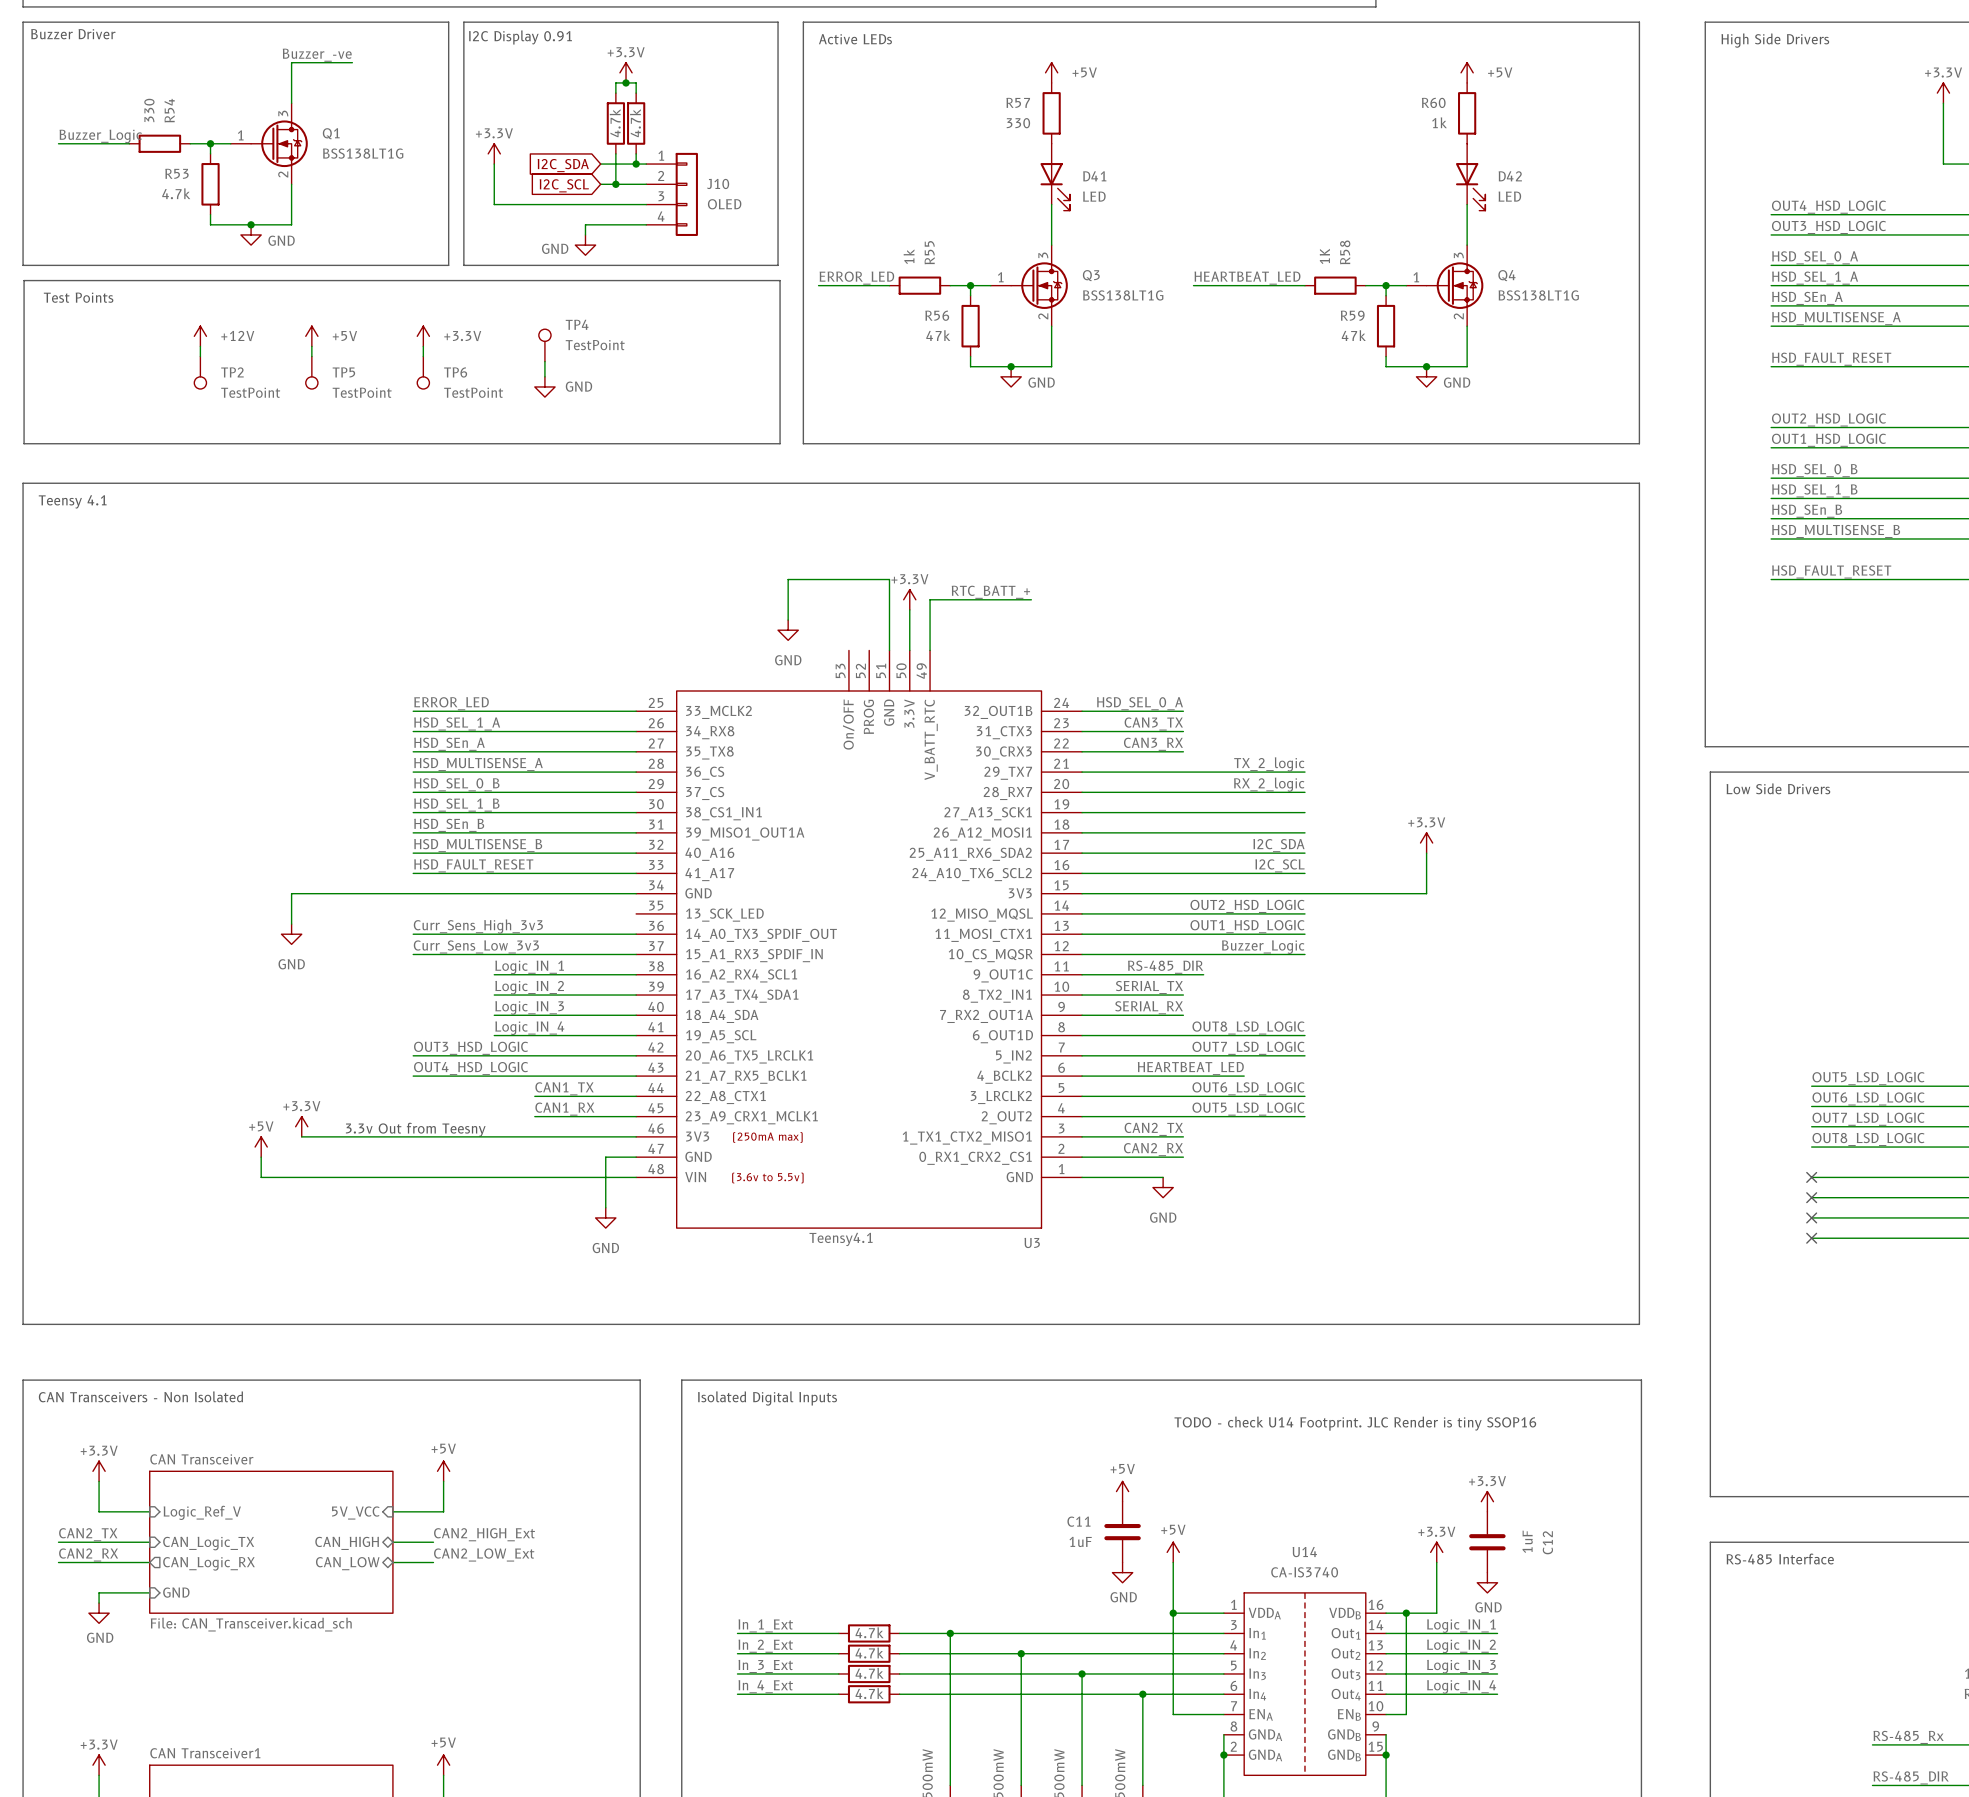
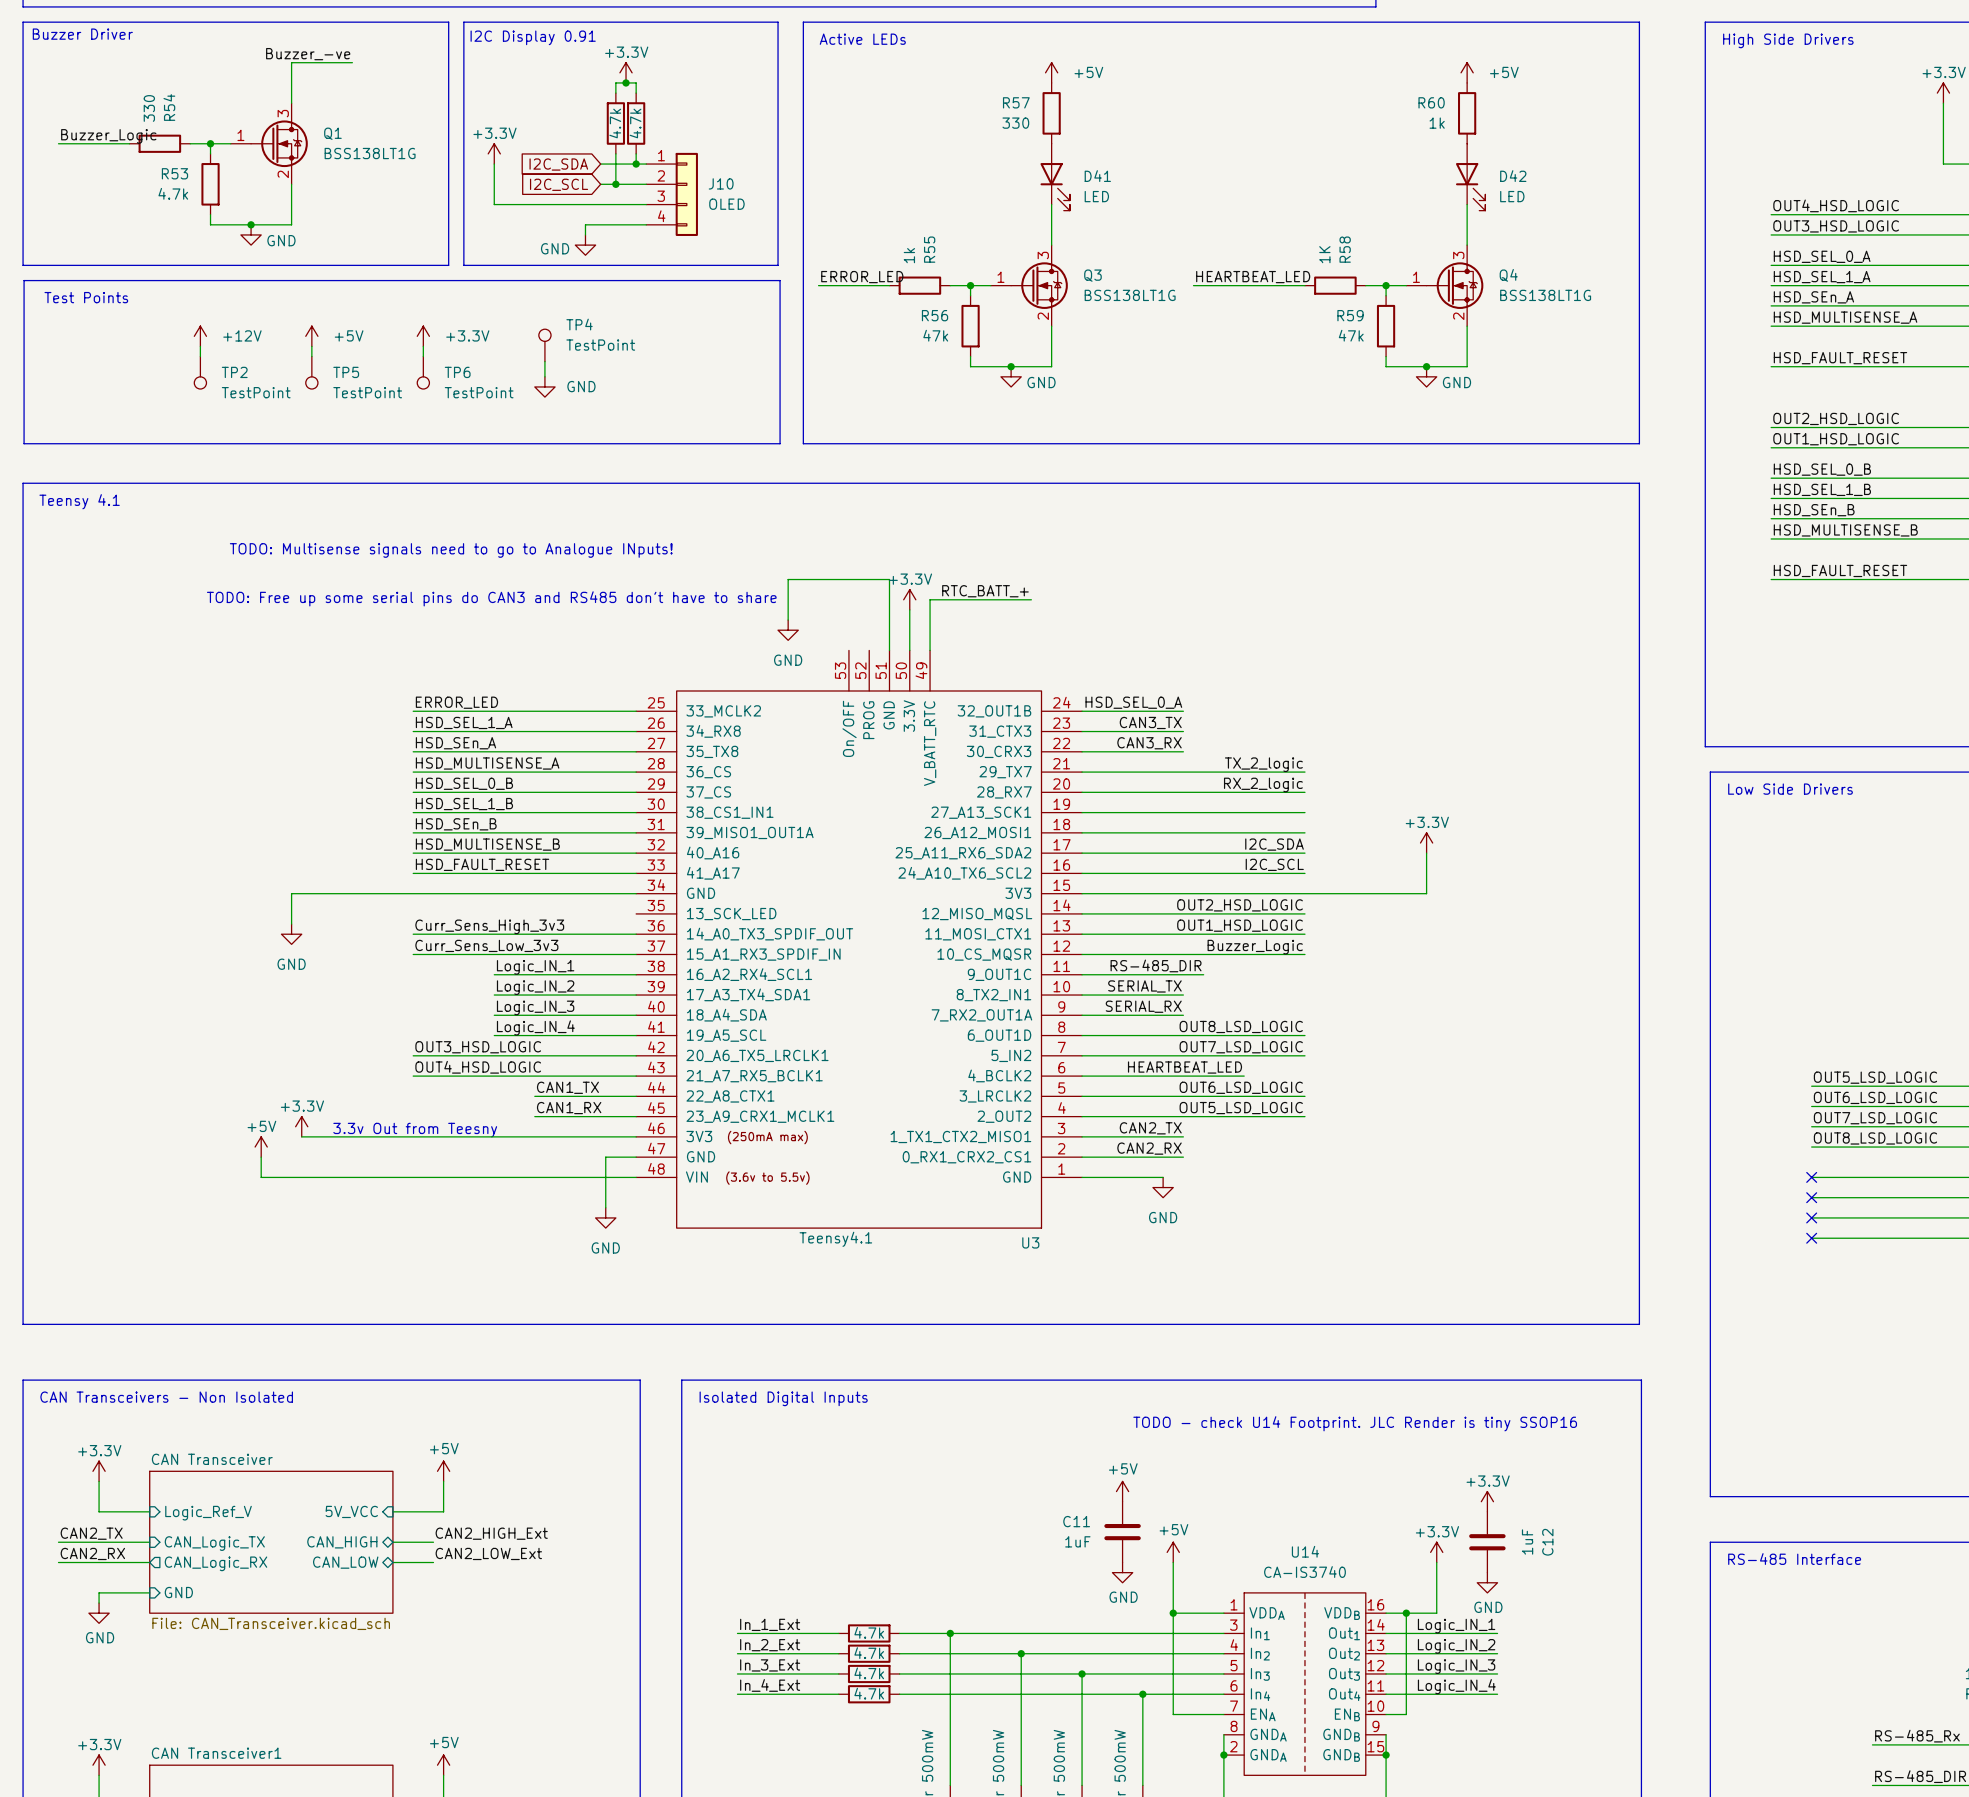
text: none -> TODO: Multisense signals need to go to Analogue INputs! (451, 550)
text: none -> TODO: Free up some serial pins do CAN3 and RS485 don't have to share (491, 598)

